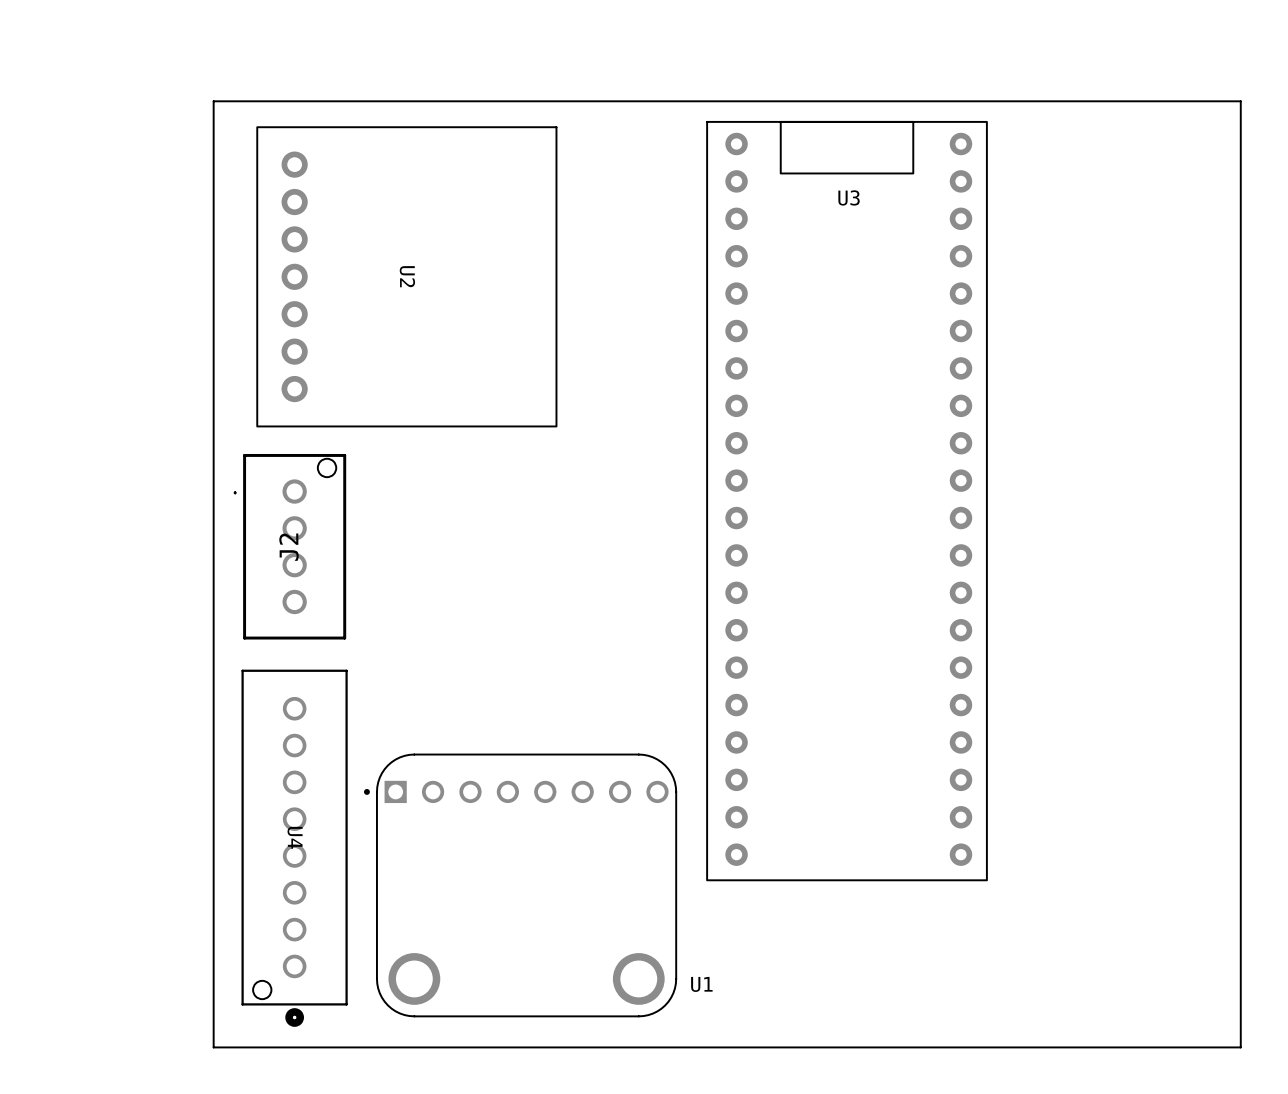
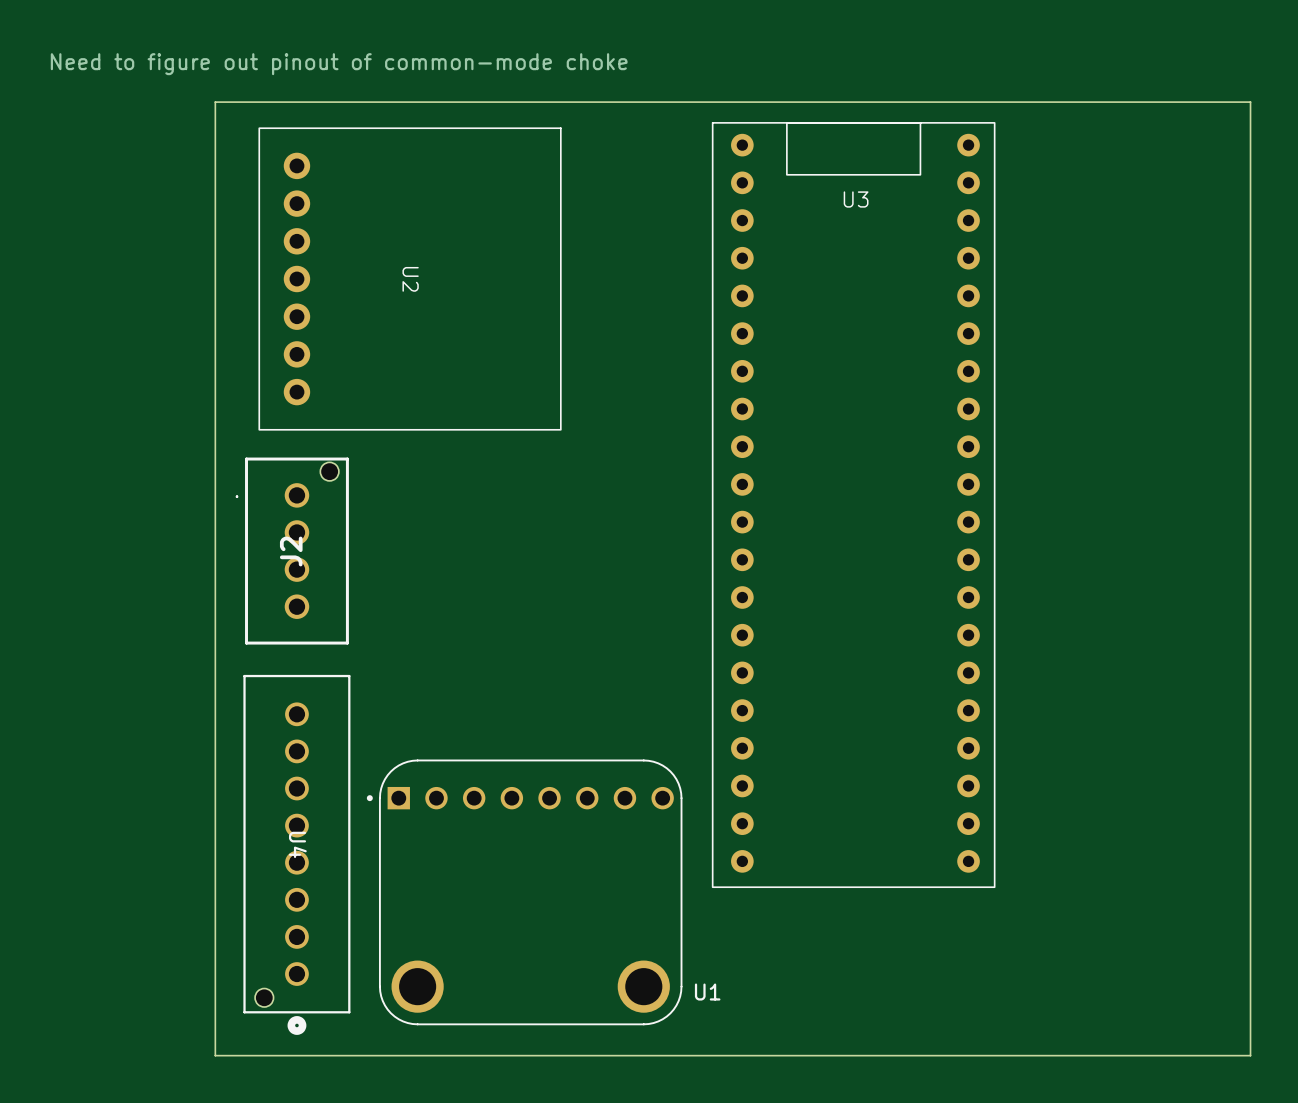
text: none -> Need to figure out pinout of common-mode choke (339, 64)

